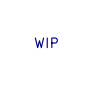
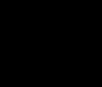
text: WIP (46, 42) -> none

